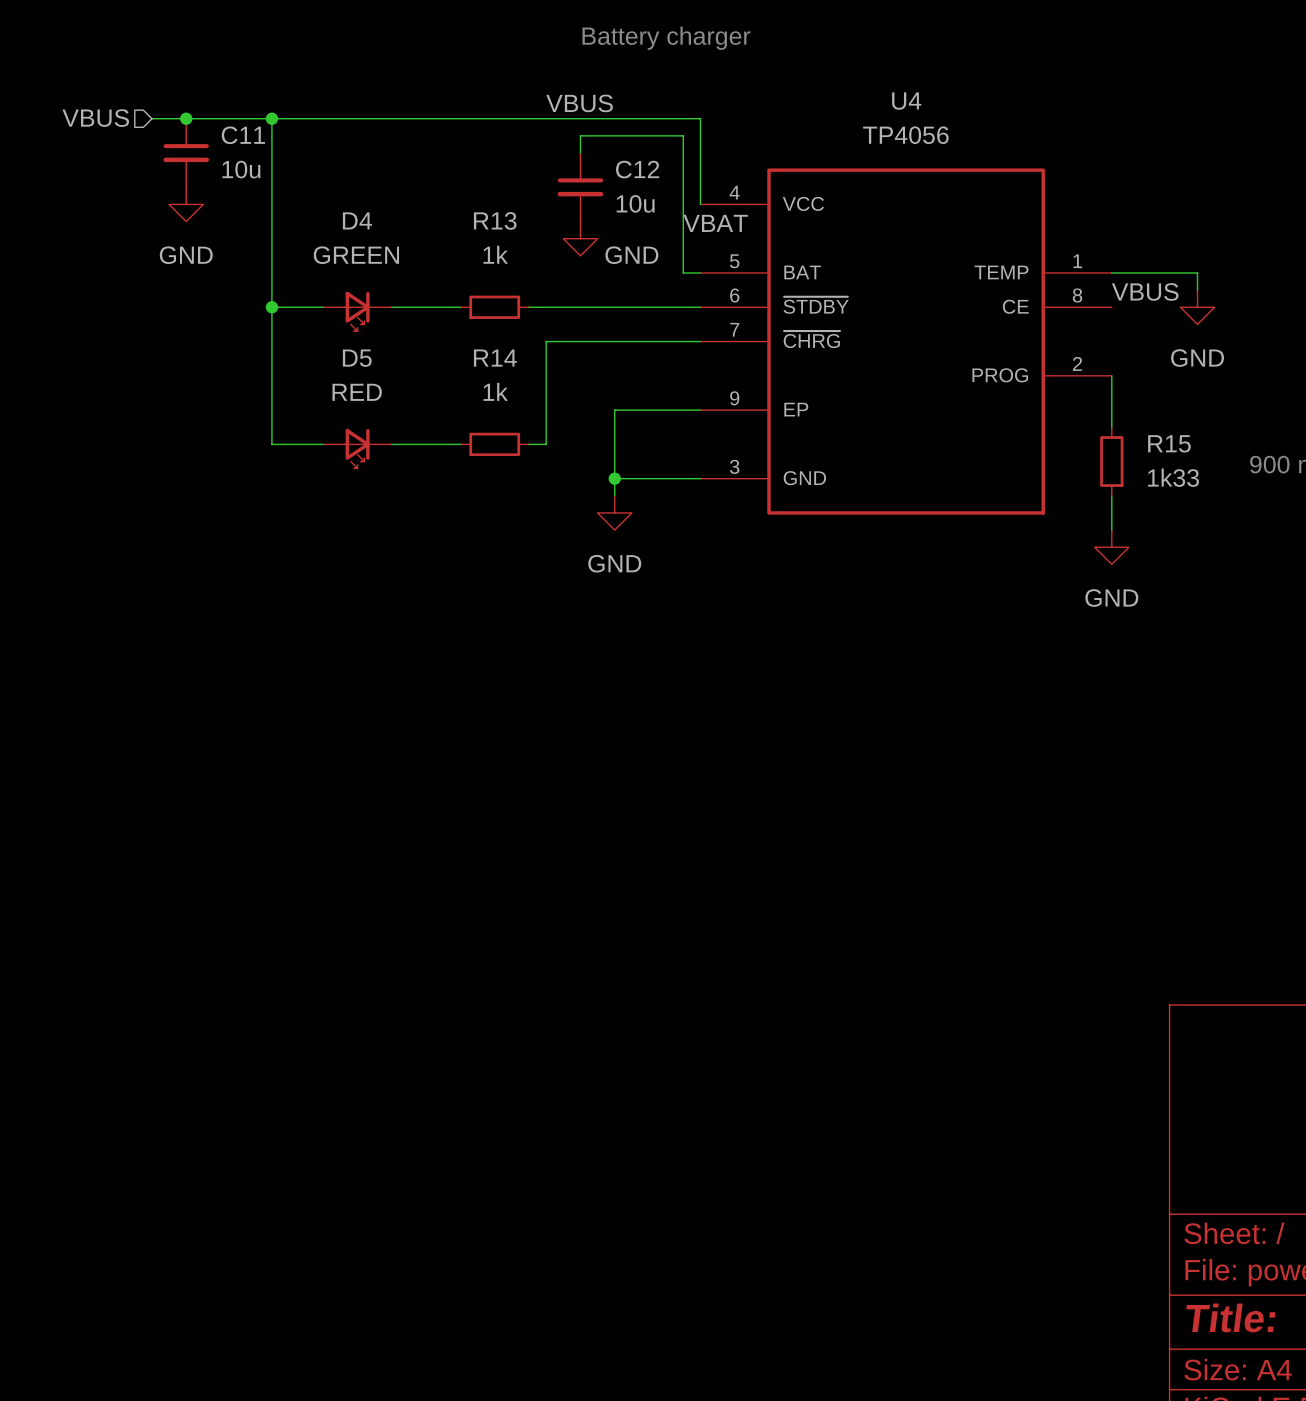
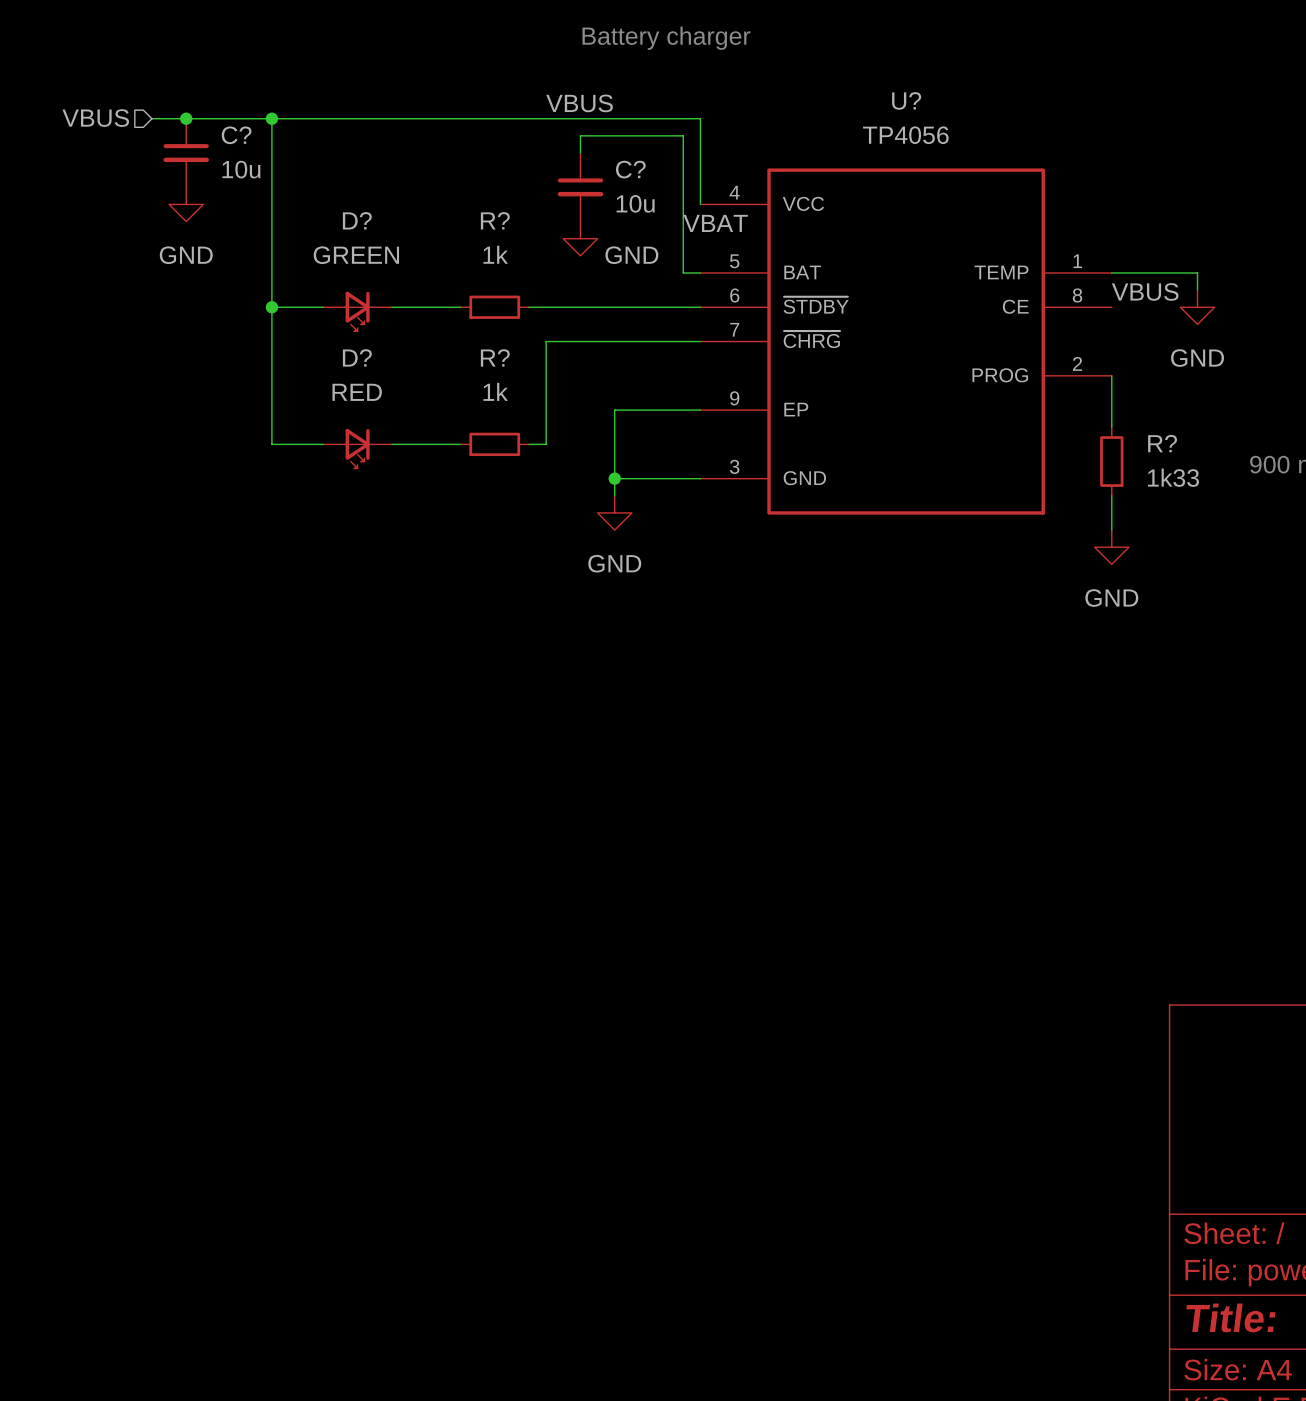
U4 name: U4 (906, 101) -> U? (906, 100)
C11 name: C11 (243, 135) -> C? (236, 135)
C12 name: C12 (637, 169) -> C? (630, 169)
D4 name: D4 (357, 220) -> D? (357, 220)
R13 name: R13 (495, 220) -> R? (495, 220)
D5 name: D5 (357, 358) -> D? (357, 357)
R14 name: R14 (495, 358) -> R? (495, 357)
R15 name: R15 (1169, 443) -> R? (1162, 443)

